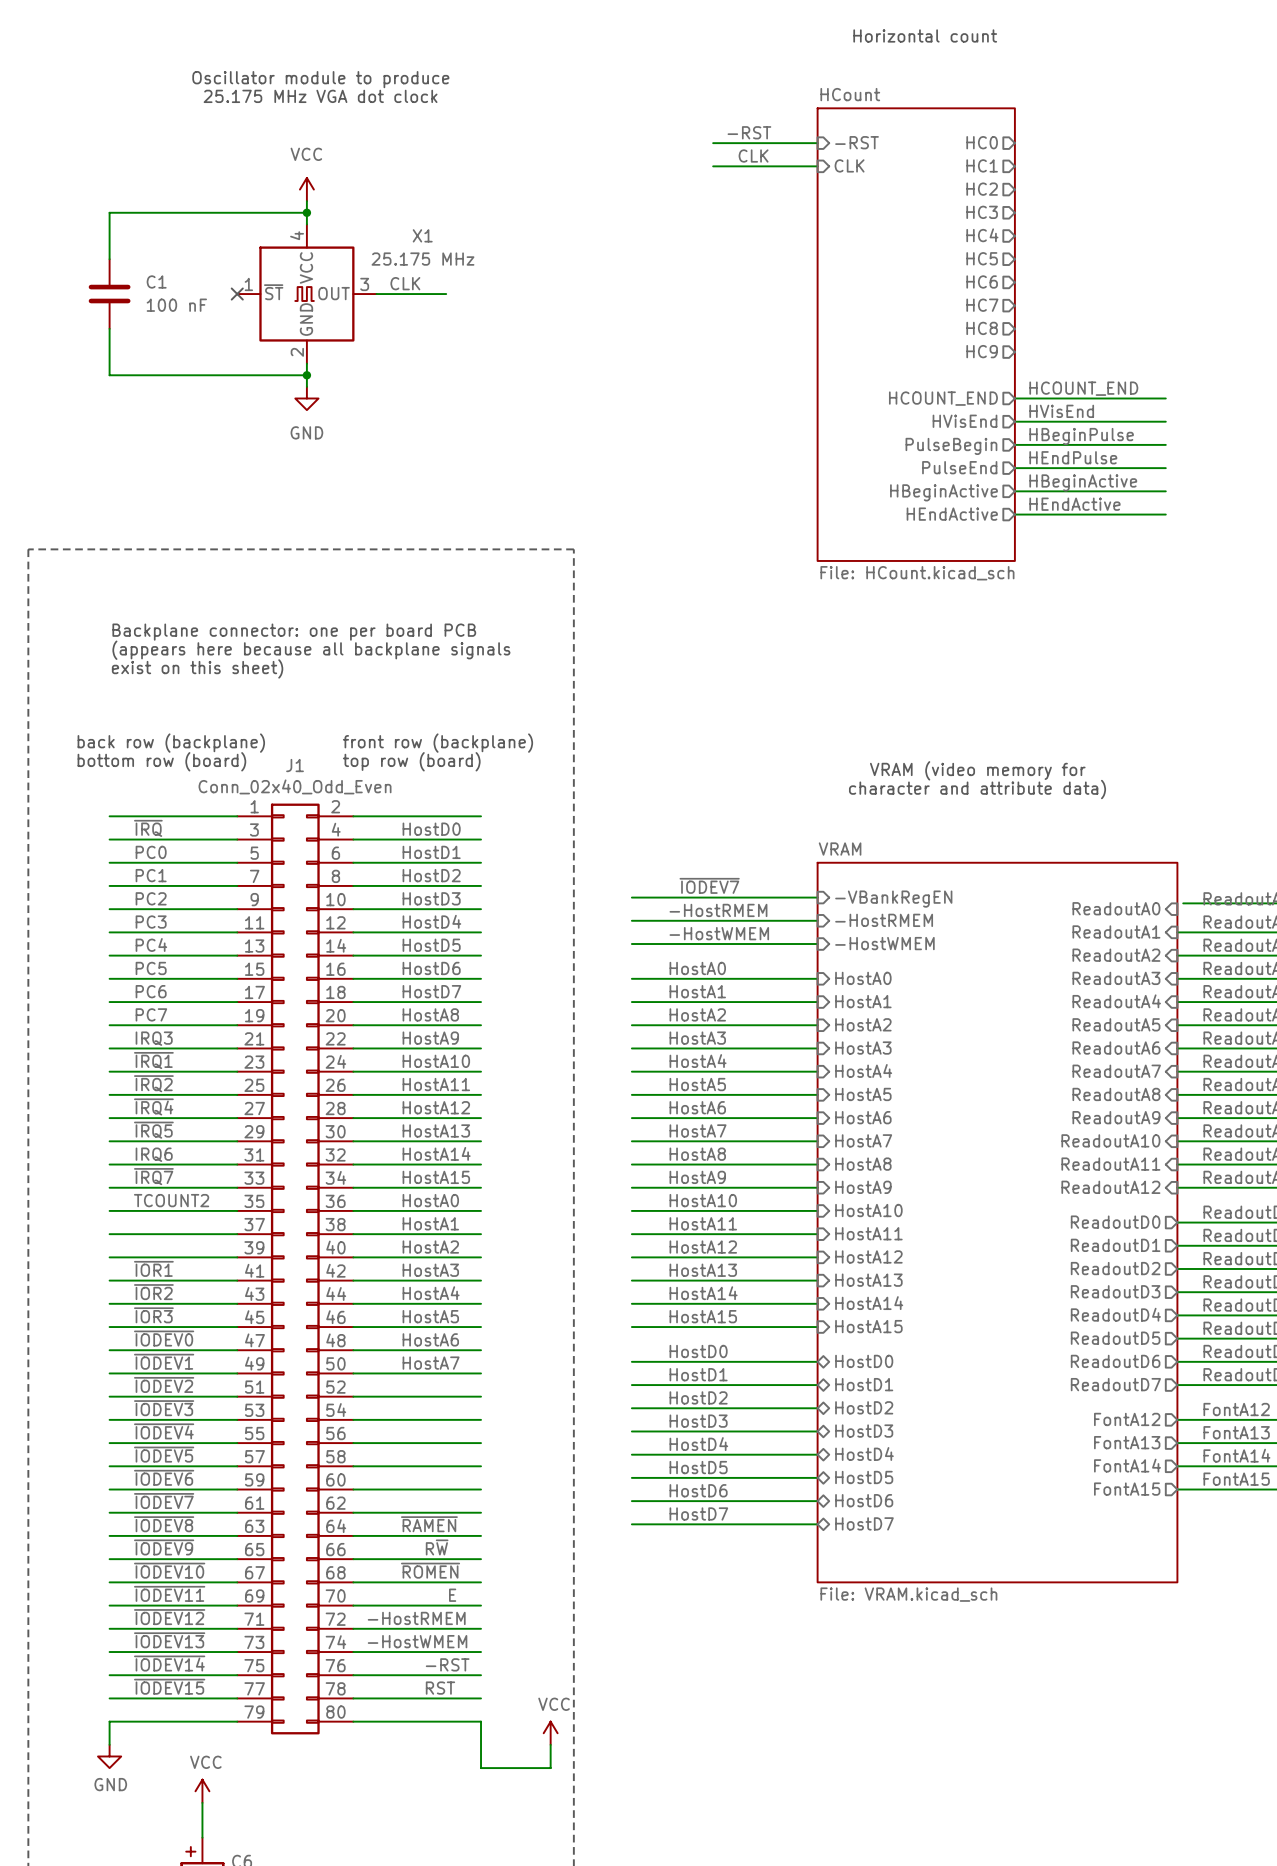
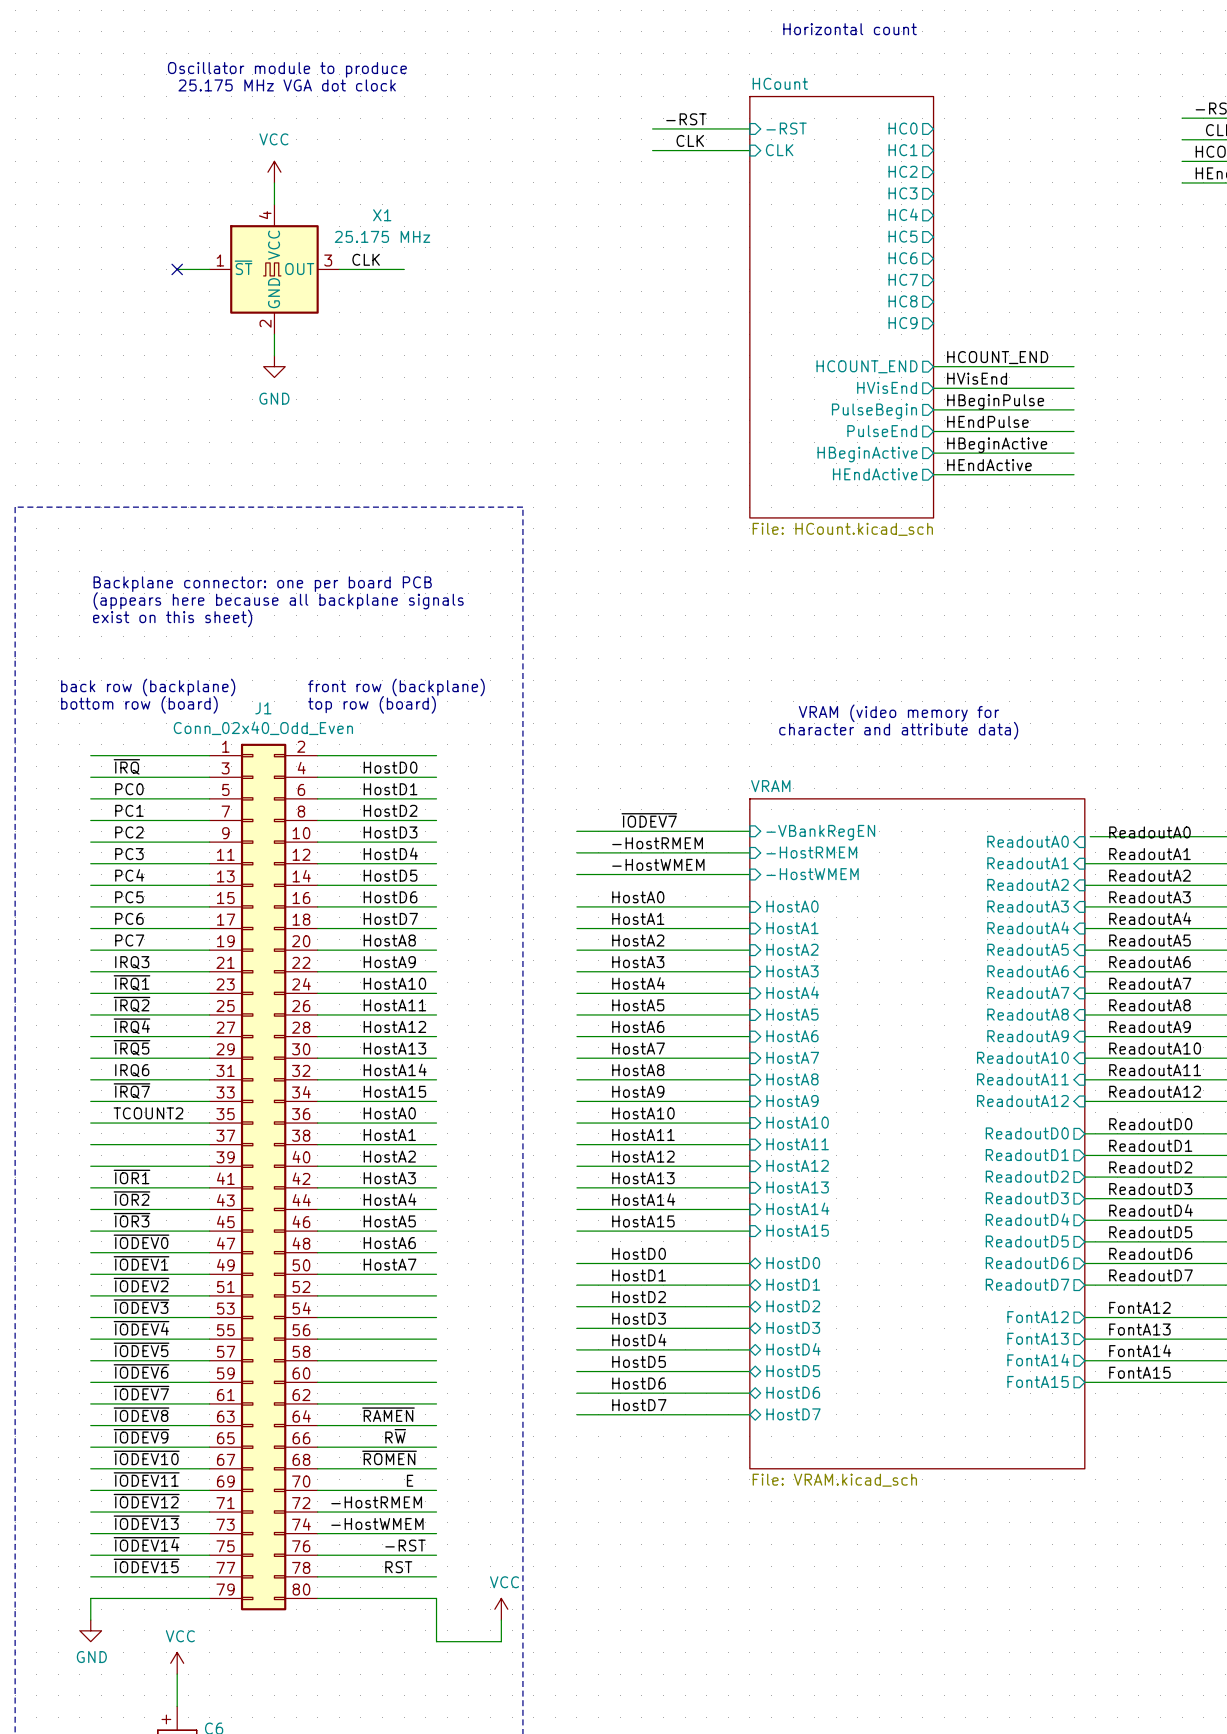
wire: (306, 212) (109, 212) (109, 259) -> none
junction: (306, 212) -> none
C1: 100 nF (109, 294) -> none
wire: none -> (177, 269) (209, 269)
no-connect mark position: (237, 294) -> (177, 269)
wire: (109, 328) (109, 375) (306, 375) -> none
junction: (306, 375) -> none

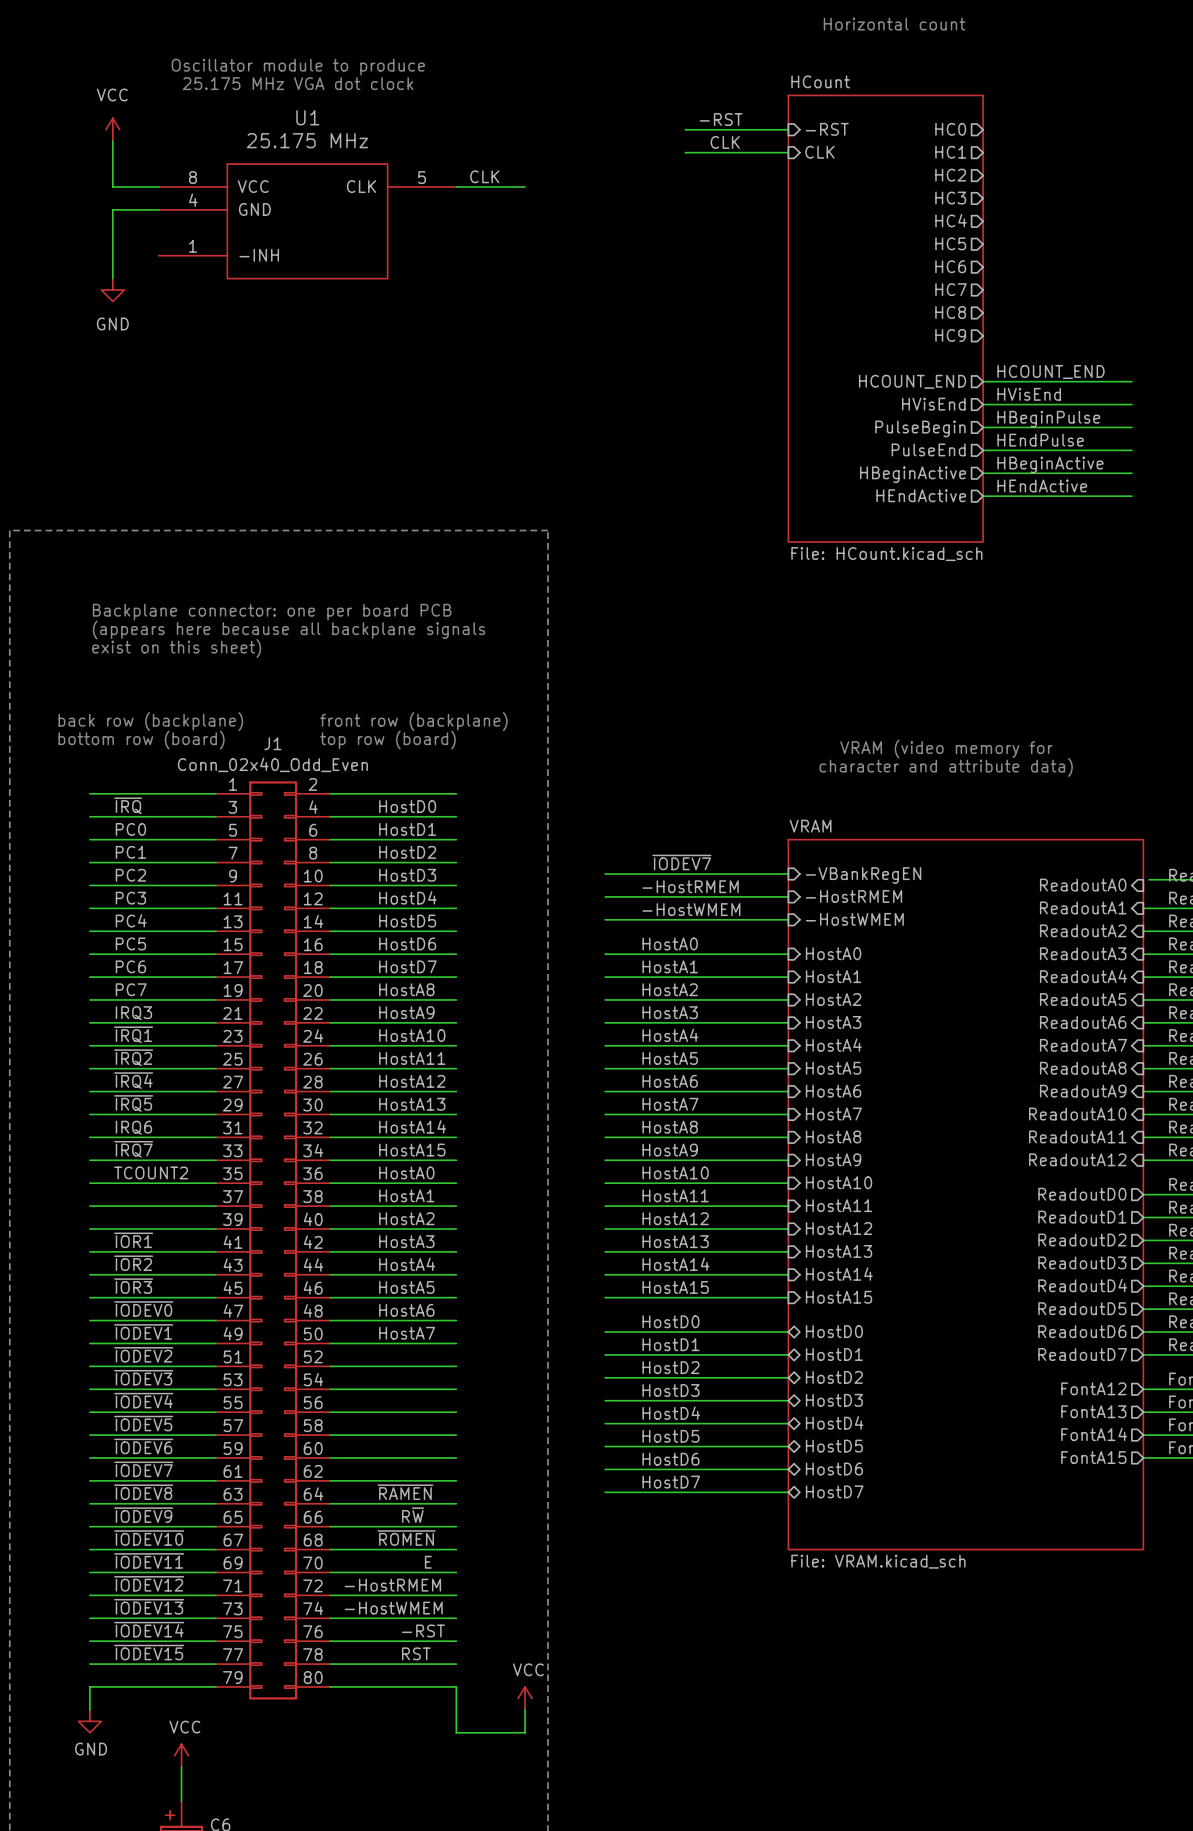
wire: none -> (112, 141) (112, 187) (158, 187)
power symbol position: VCC (274, 172) -> VCC (112, 129)
wire: (274, 182) (274, 204) -> none
wire: none -> (158, 209) (112, 209) (112, 278)
U1: none -> 25.175 MHz (307, 221)
label position: CLK (366, 259) -> CLK (484, 176)
wire: (177, 269) (209, 269) -> none
no-connect mark: (177, 269) -> none
X1: 25.175 MHz (274, 269) -> none
wire: (339, 269) (404, 269) -> (456, 187) (525, 187)
wire: (274, 334) (274, 355) -> none
power symbol position: GND (274, 366) -> GND (112, 290)

